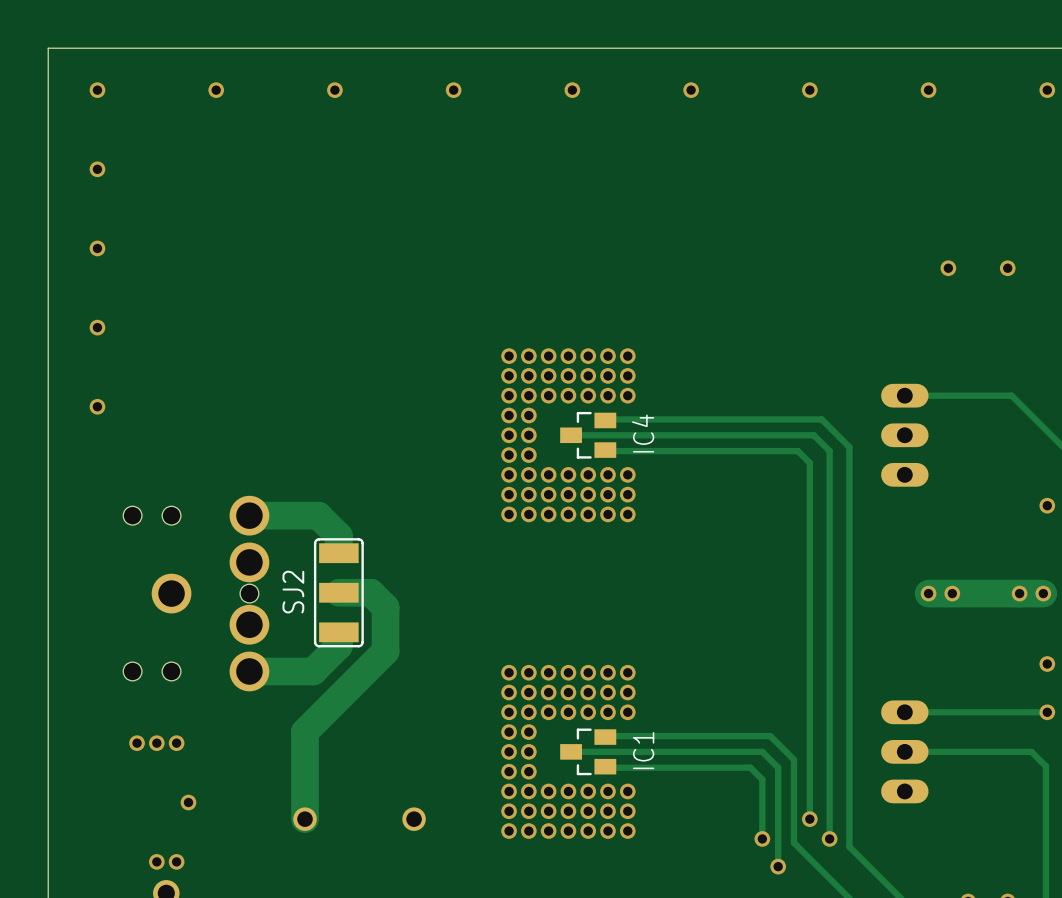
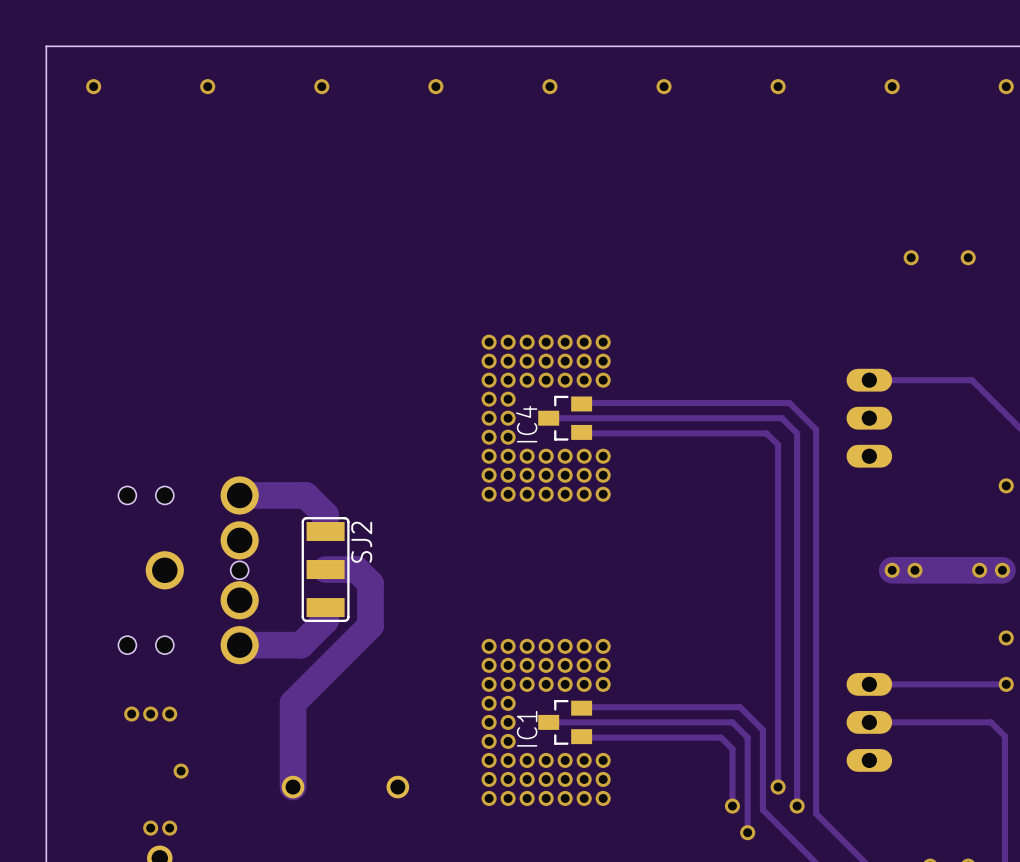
via: (97, 169) -> none
via: (97, 248) -> none
via: (97, 327) -> none
via: (97, 406) -> none
IC4 name position: IC4 (643, 433) -> IC4 (526, 424)
SJ2 name position: SJ2 (293, 592) -> SJ2 (361, 542)
IC1 name position: IC1 (643, 750) -> IC1 (527, 728)

